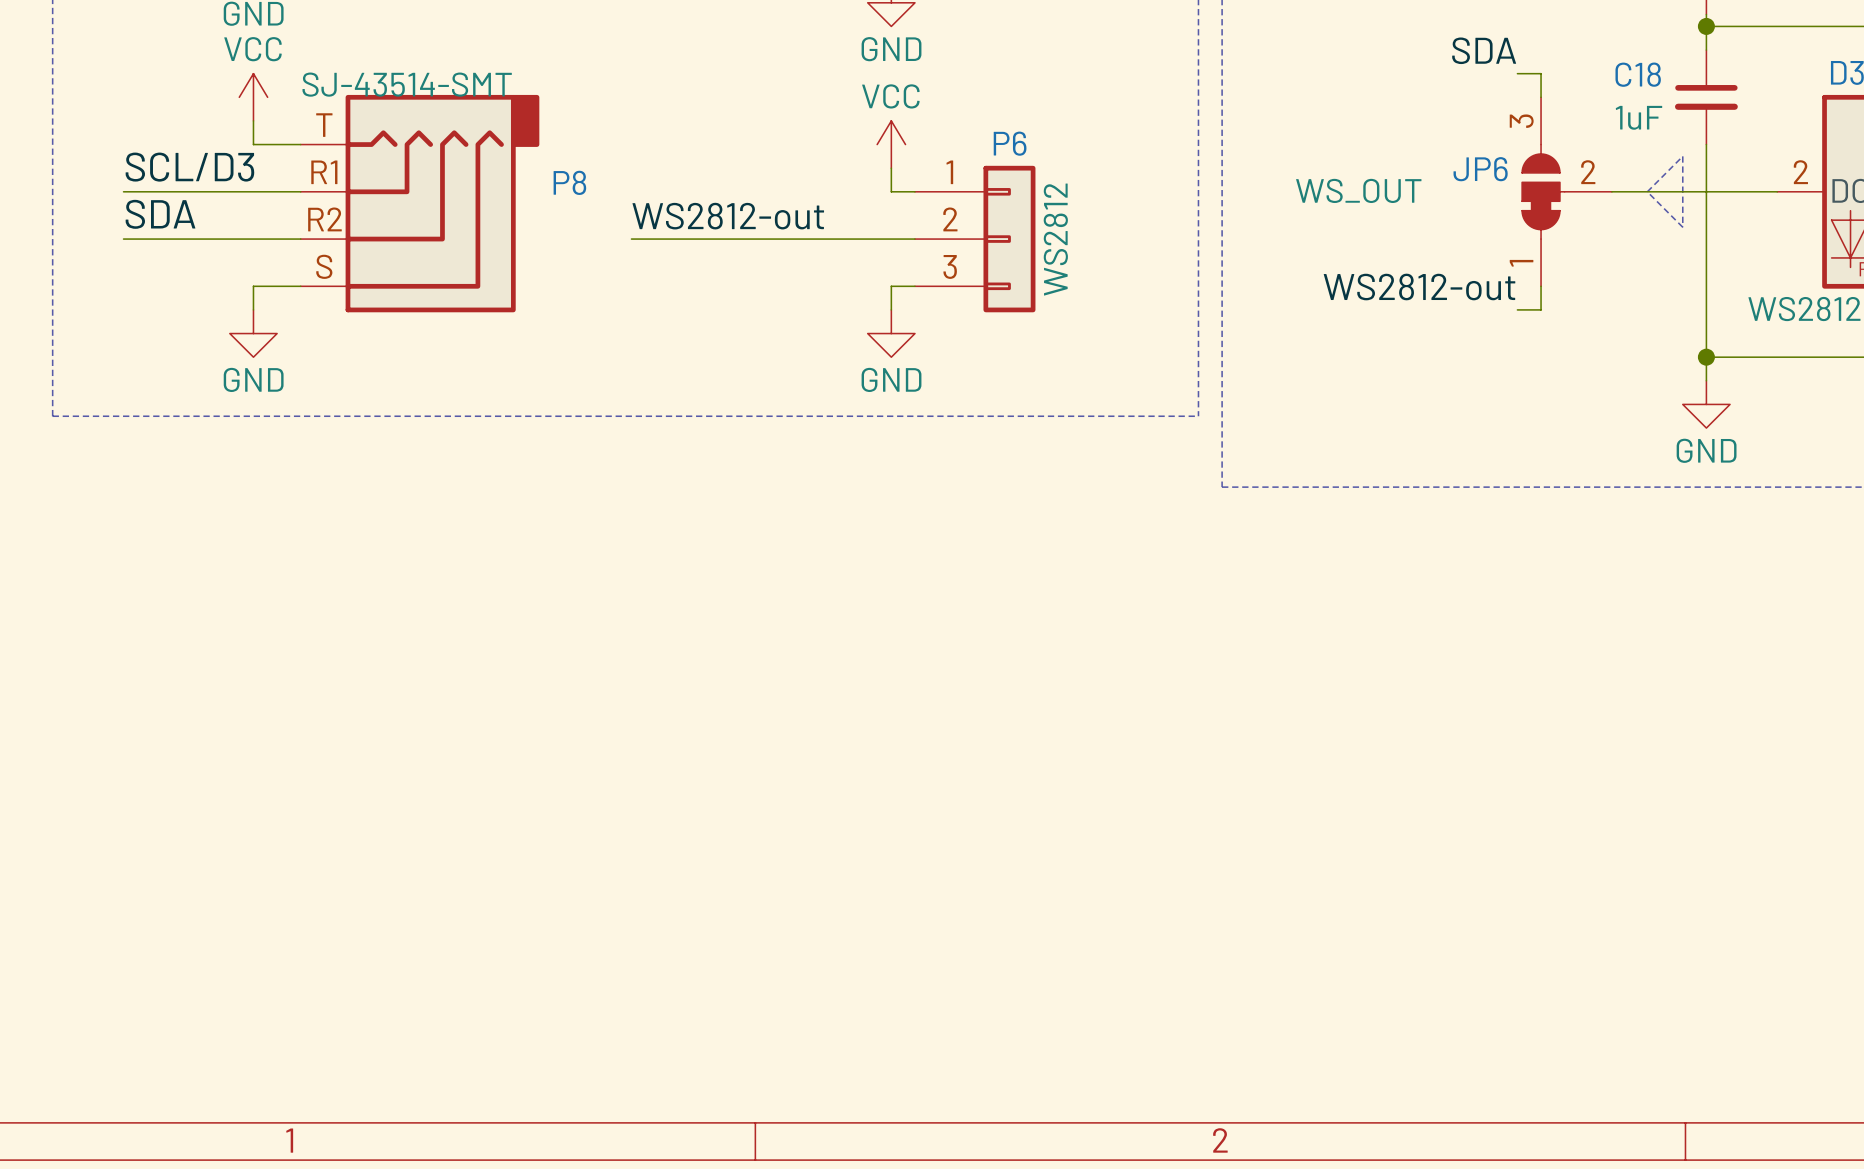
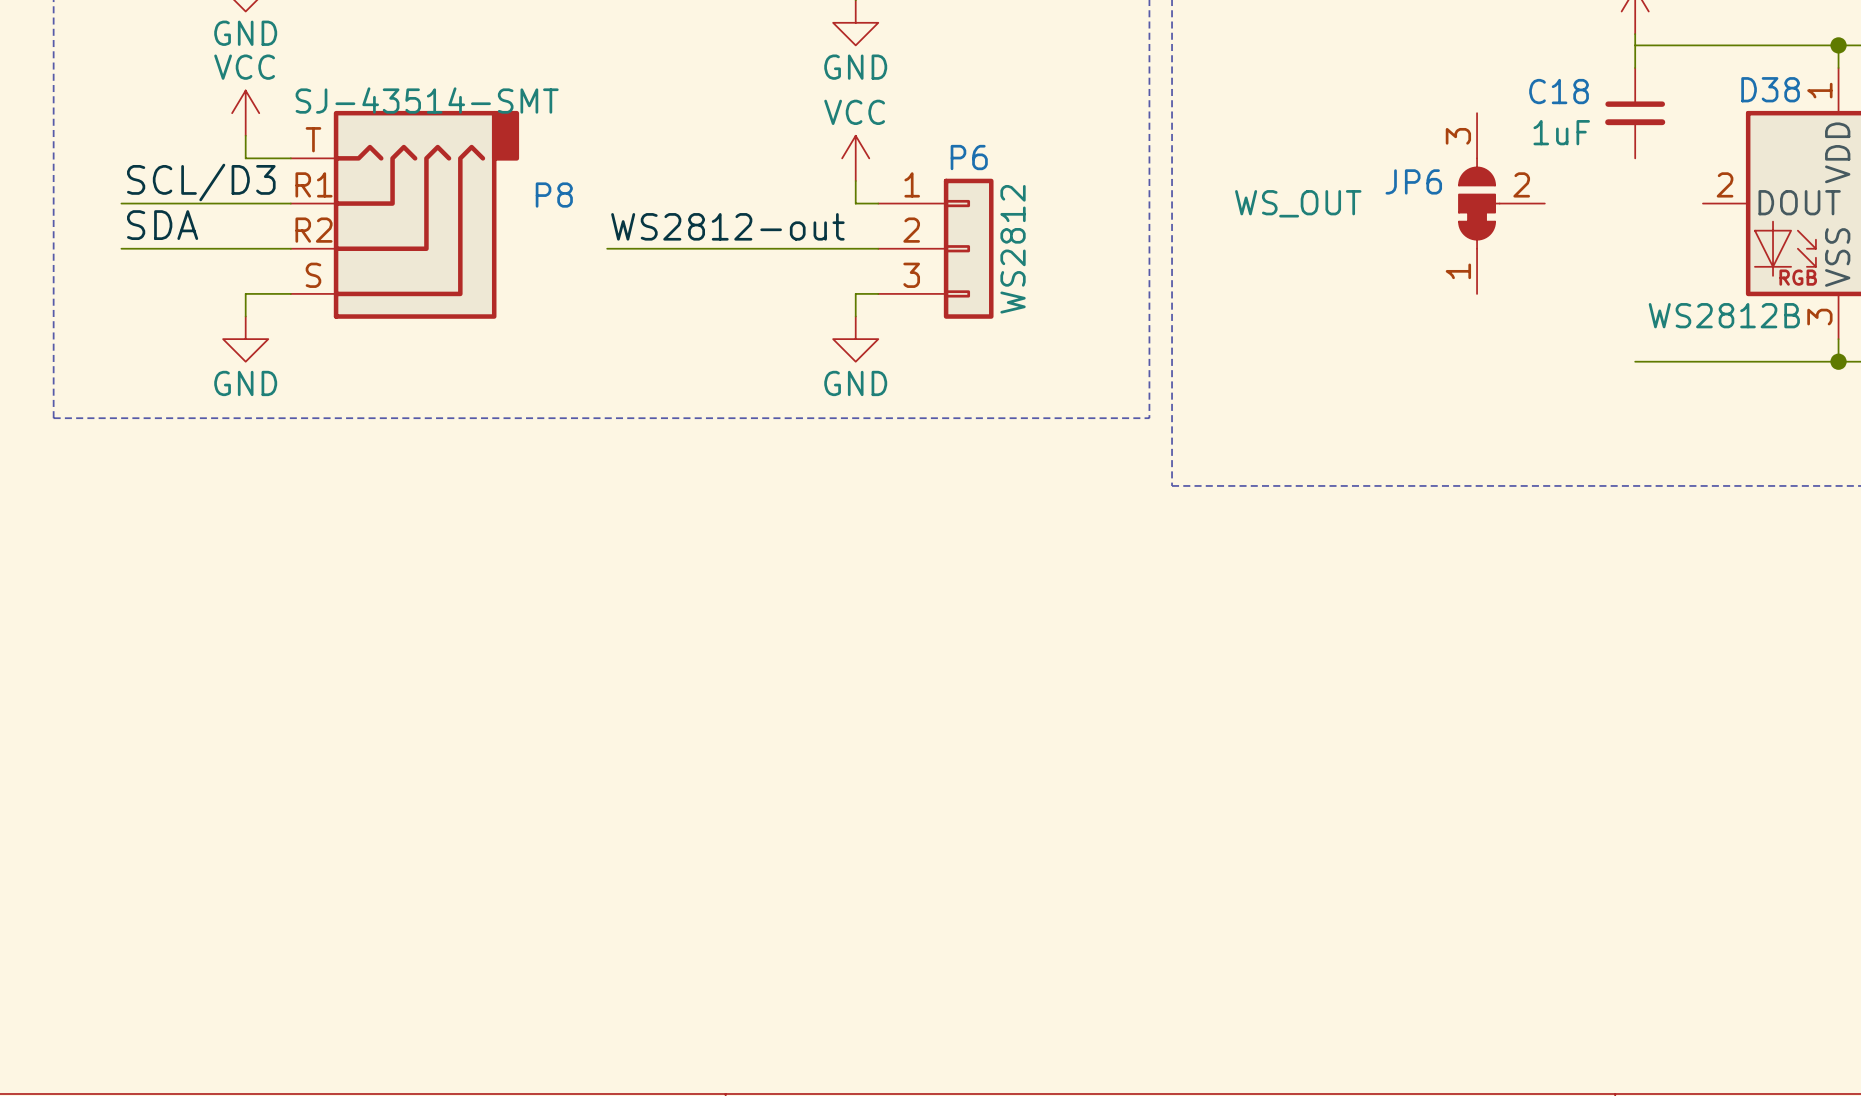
junction: (1706, 26) -> none
label: SDA (1484, 50) -> none
wire: (1517, 73) (1541, 73) (1541, 97) -> none
wire: (1706, 144) (1706, 380) -> none
line: (1682, 156) (1647, 191) (1682, 227) (1682, 156) -> none
wire: (1611, 191) (1777, 191) -> none
label: WS2812-out (1419, 286) -> none
wire: (1541, 286) (1541, 309) (1517, 309) -> none
junction: (1706, 357) -> none
power symbol: GND (1706, 404) -> none

